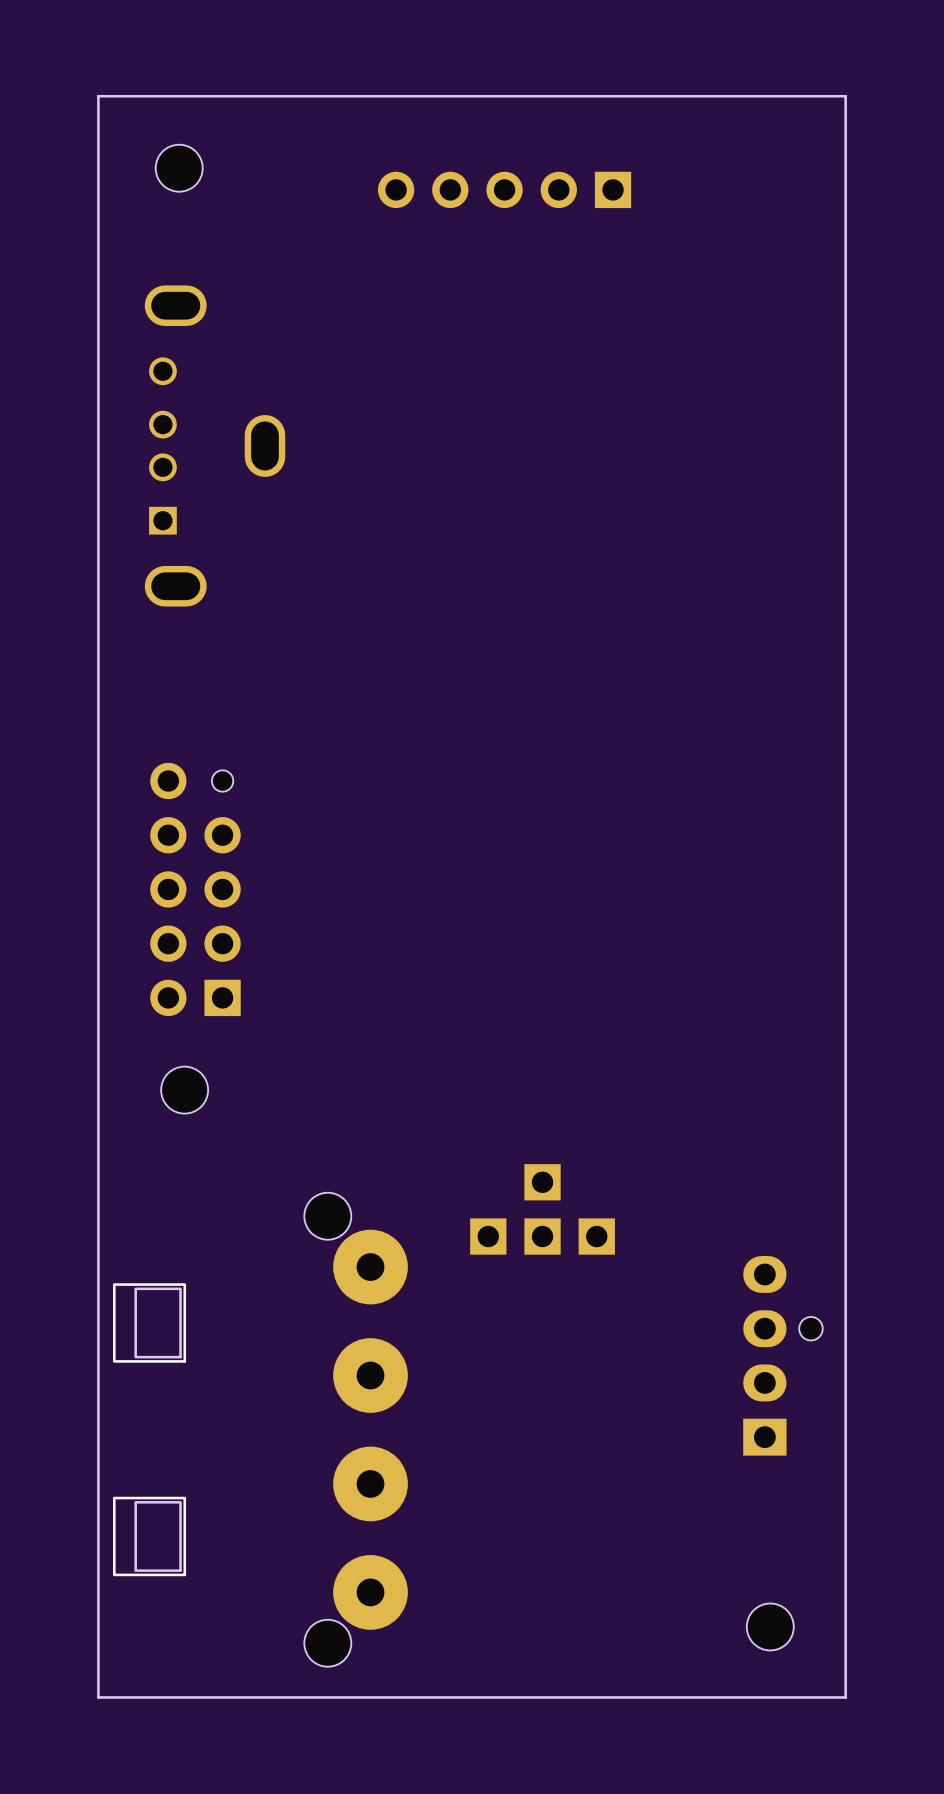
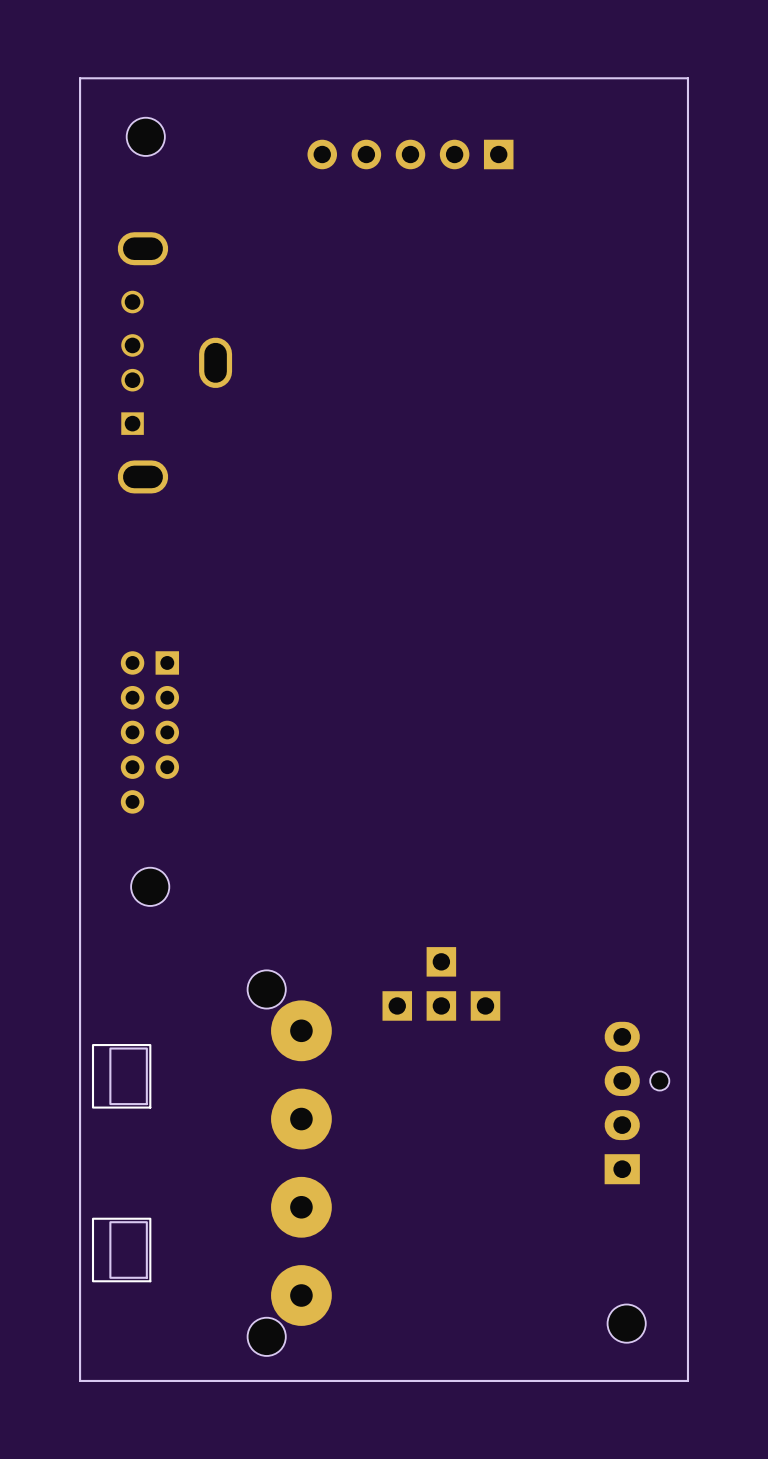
part footprint: [150, 762, 241, 1017] -> [120, 651, 180, 814]

